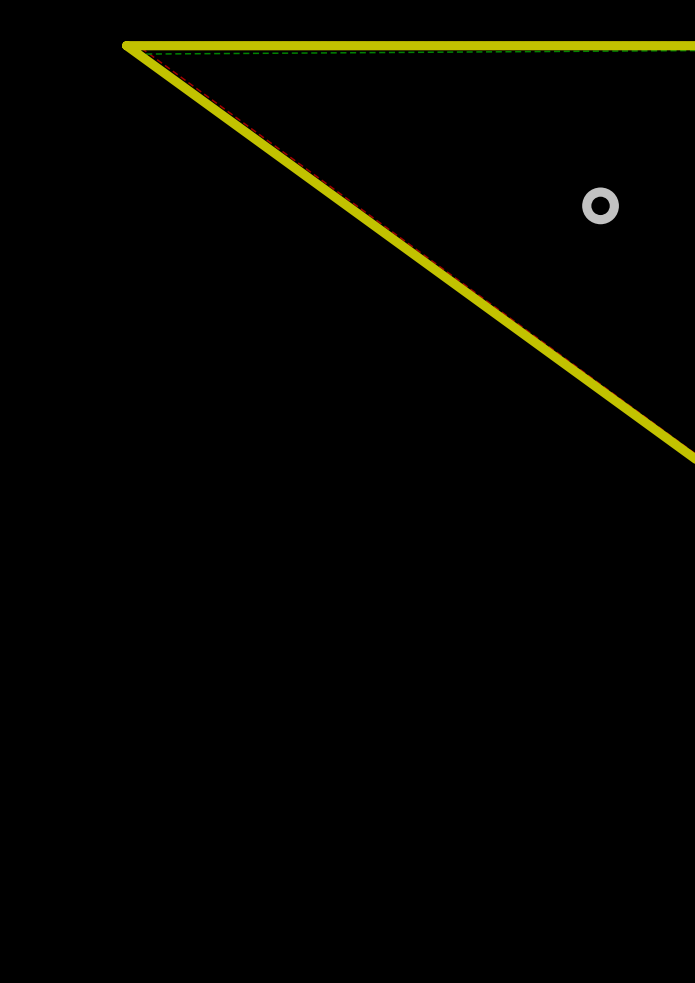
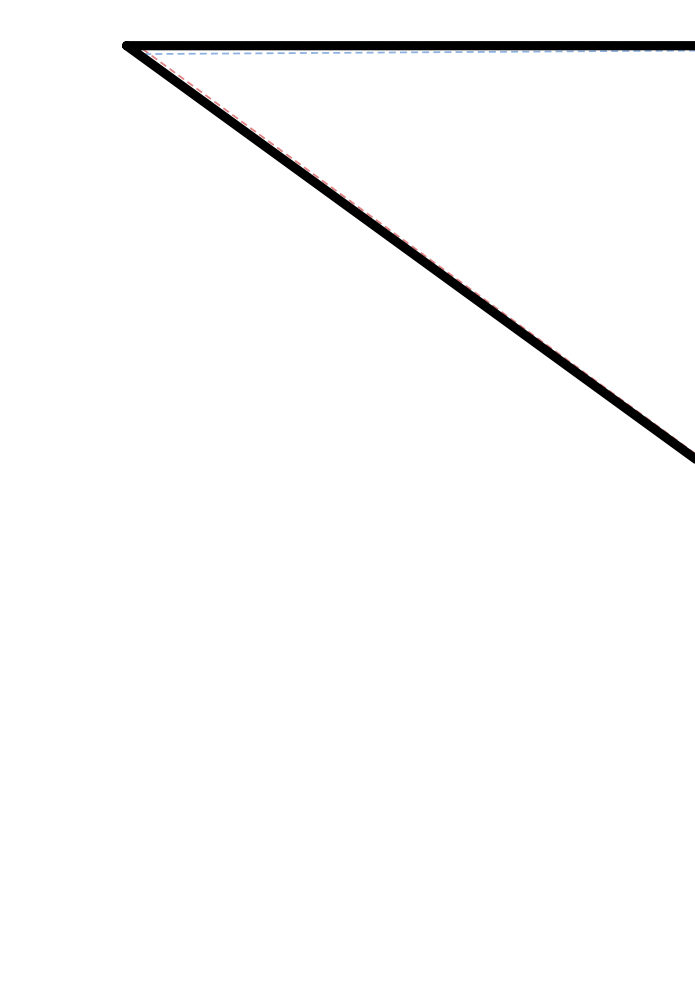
via: (600, 205) -> none

